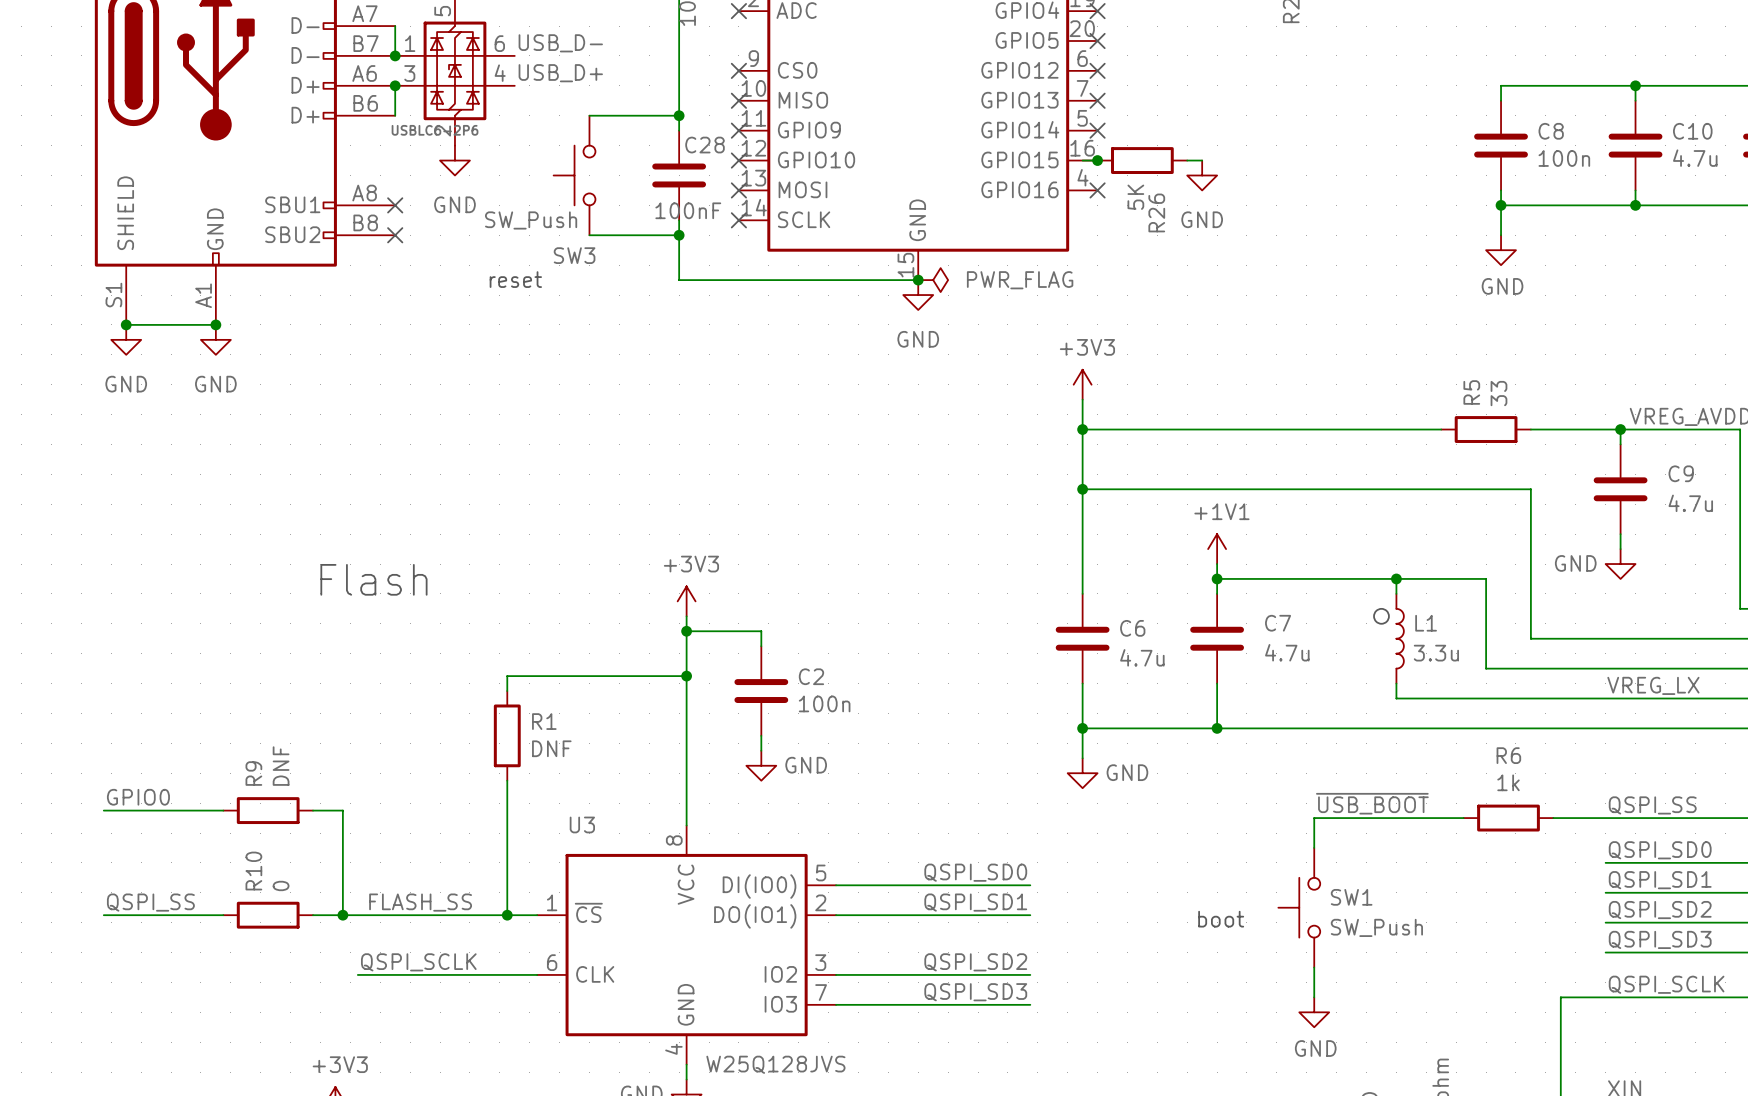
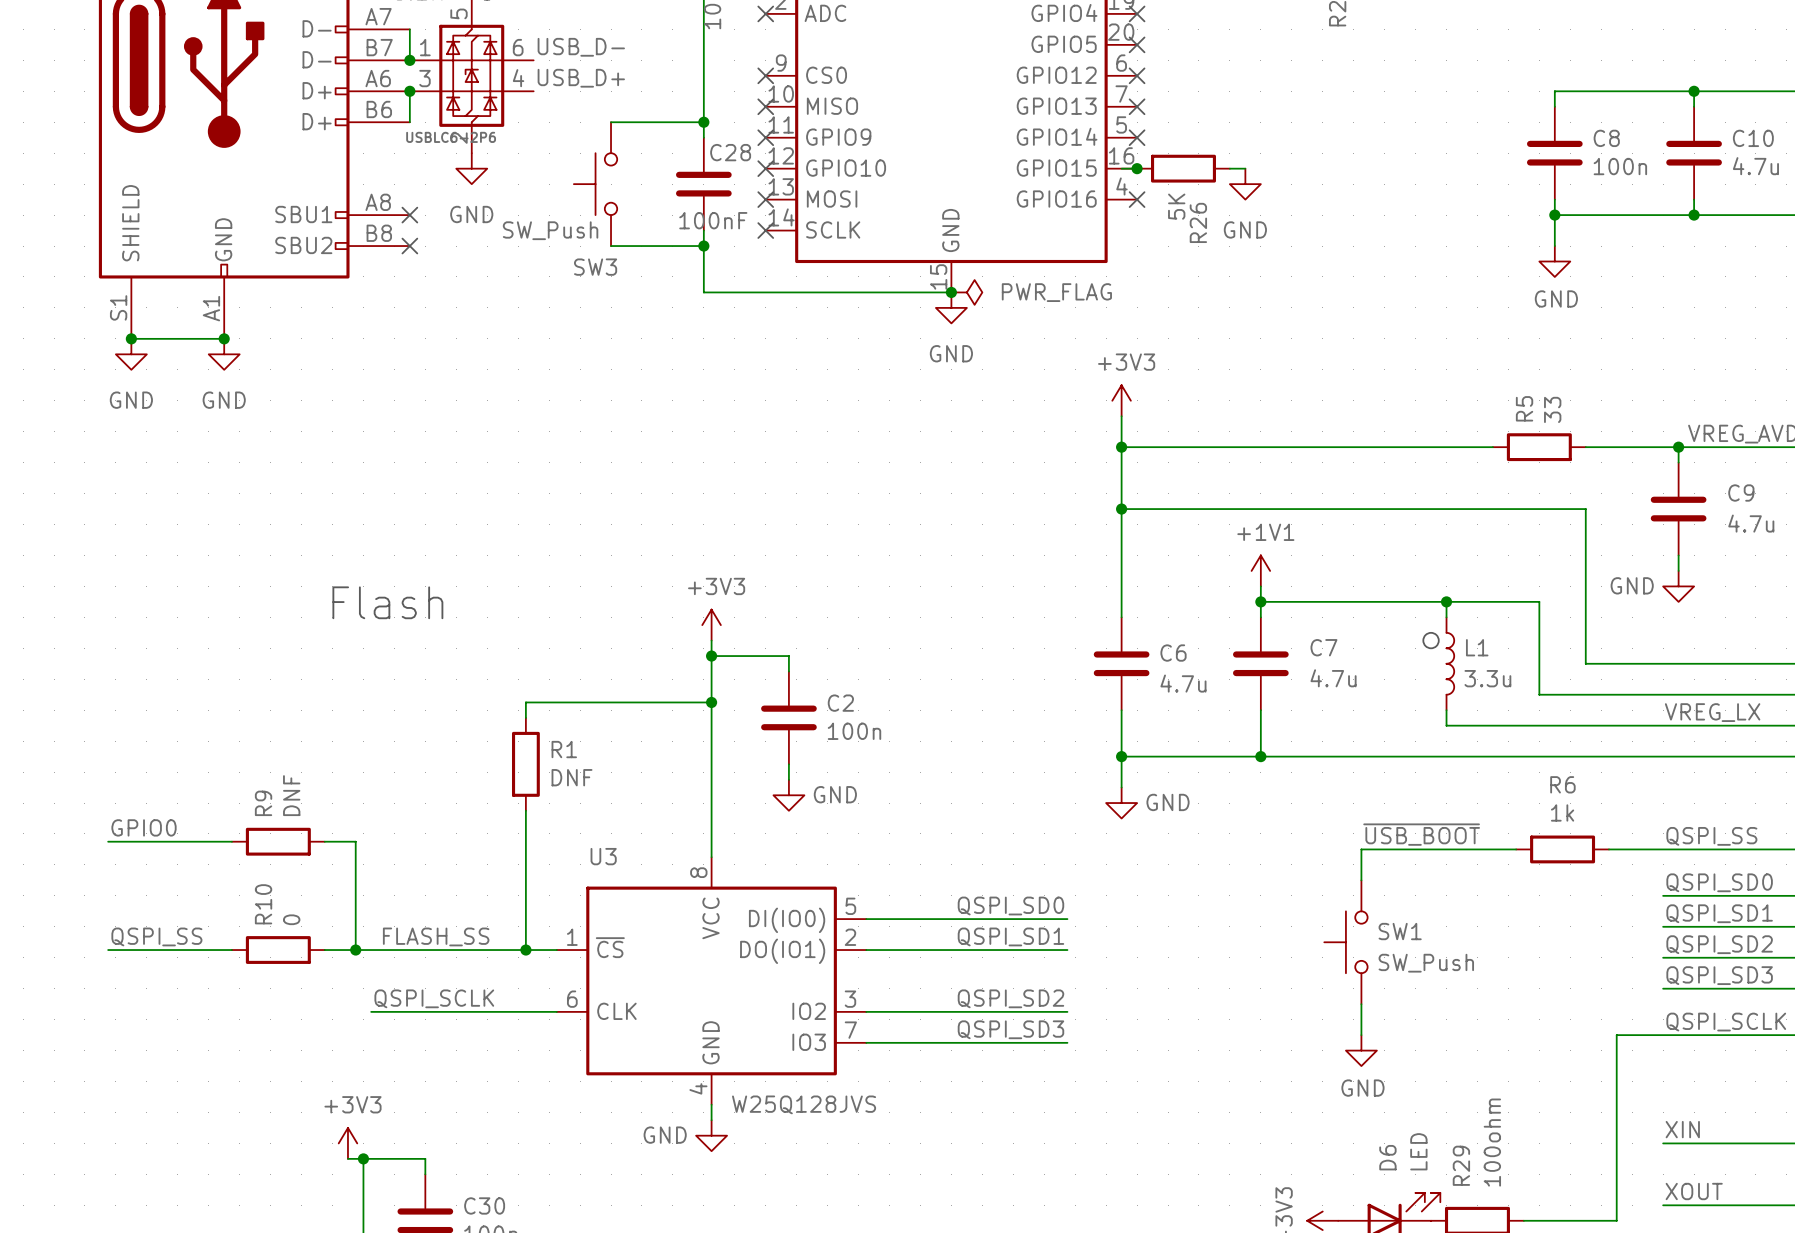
text: reset (515, 279) -> none
text: boot (1221, 919) -> none

